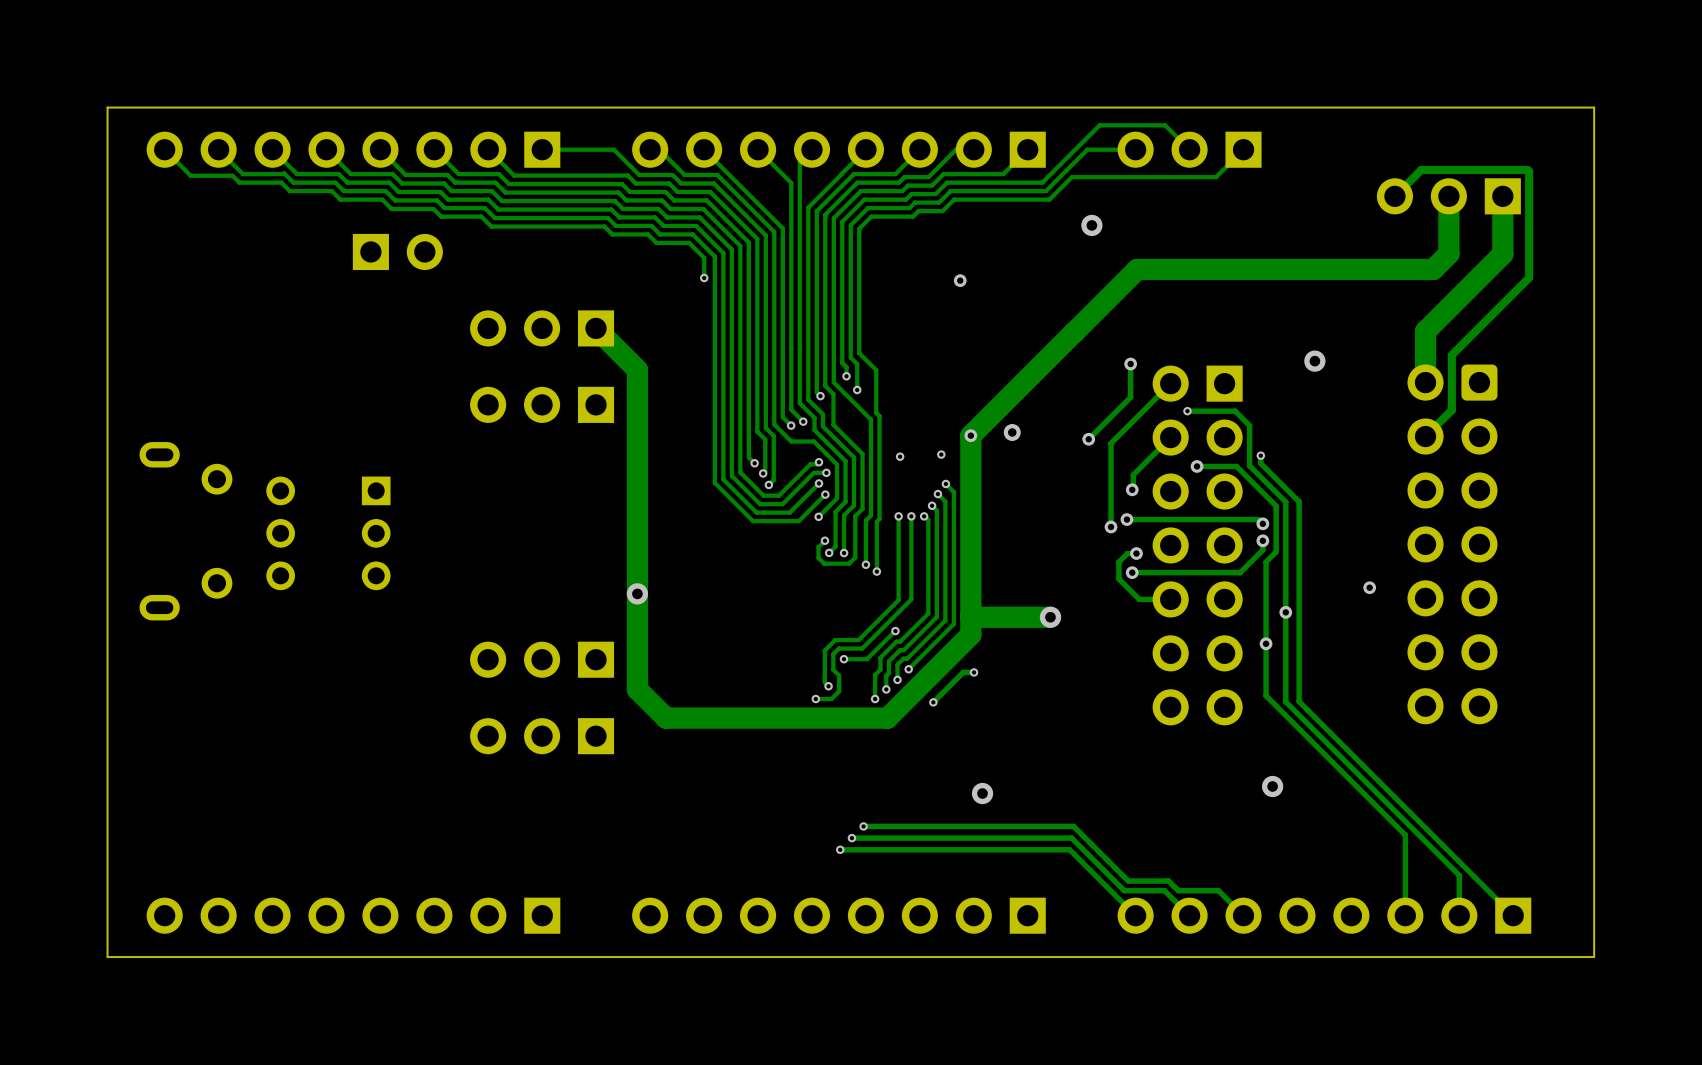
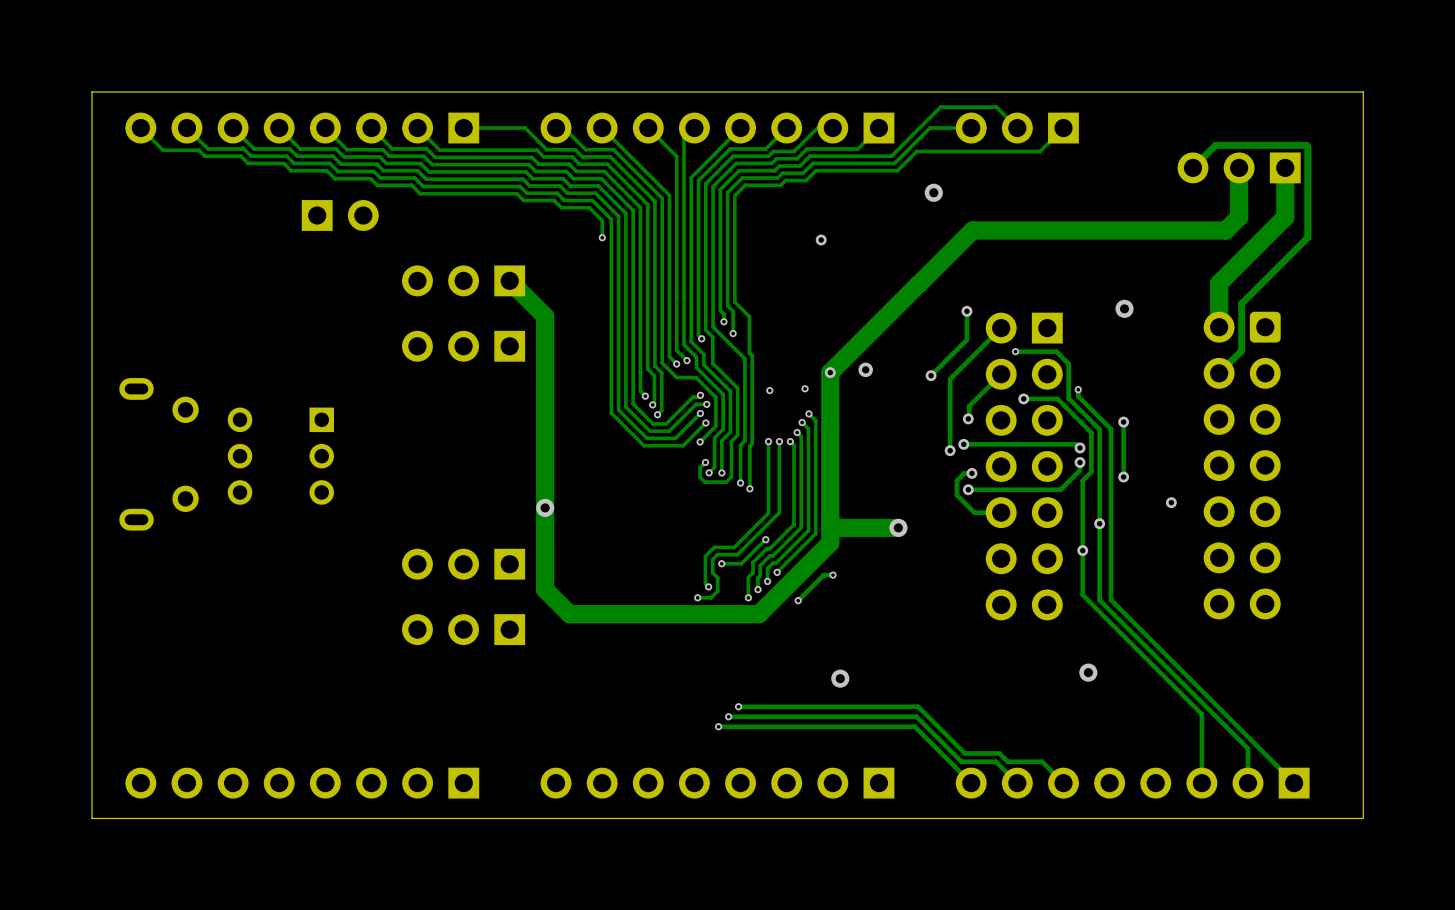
track: none -> (1123, 422) (1123, 477)
via: none -> (1123, 422)
via: none -> (1123, 477)

